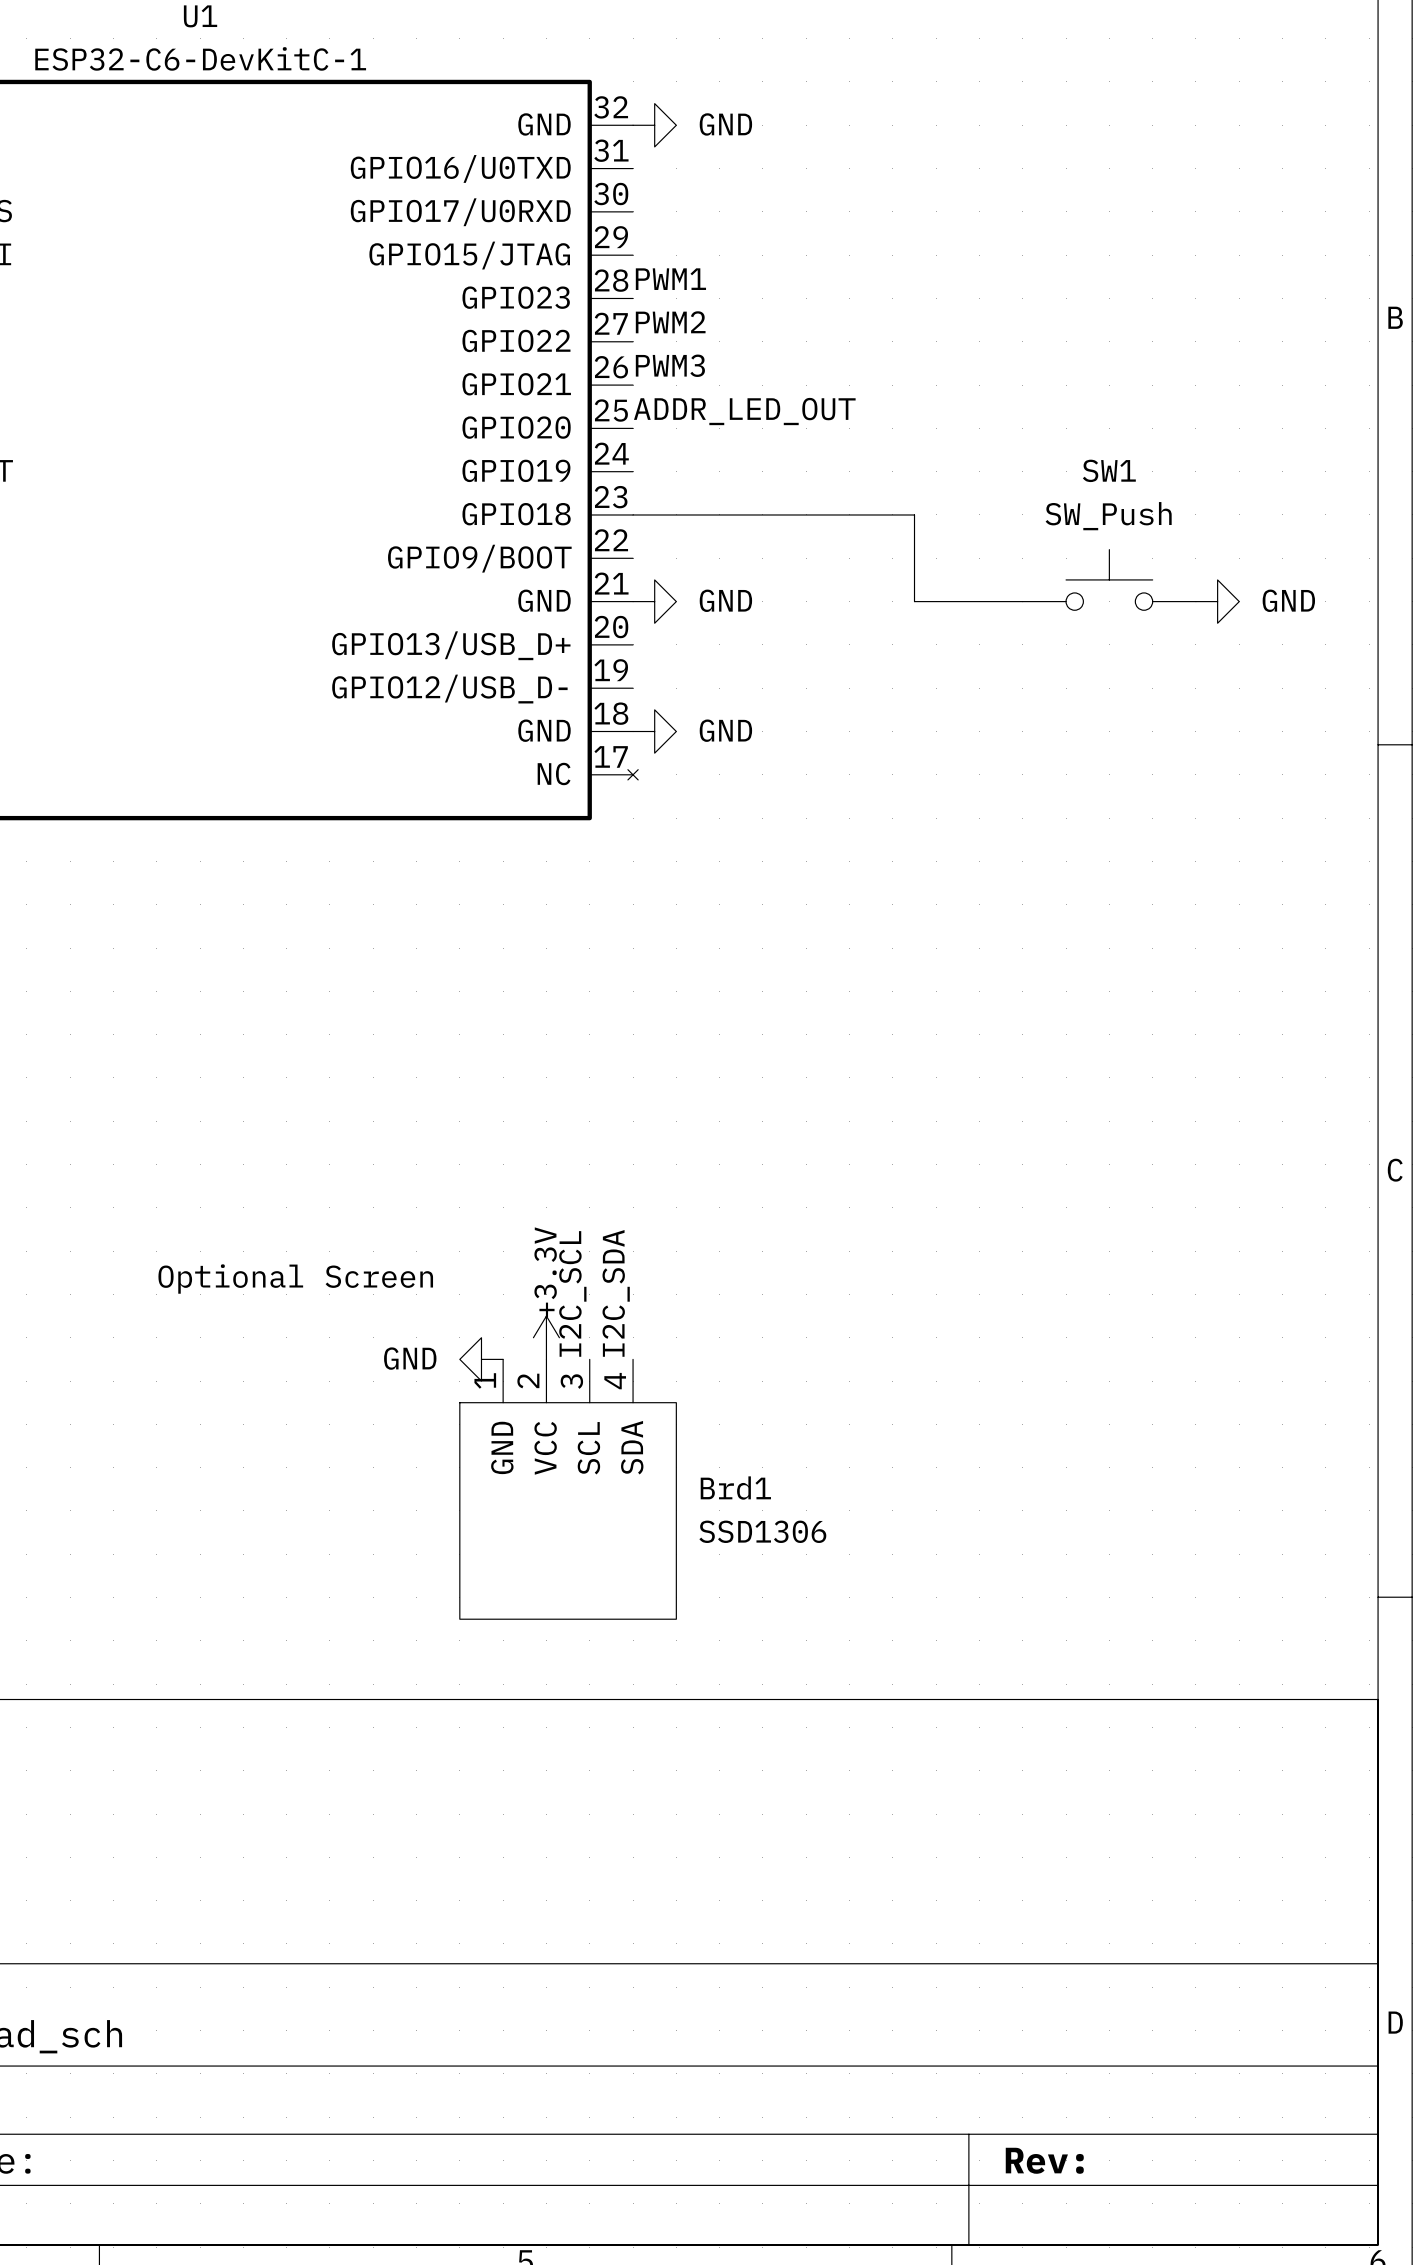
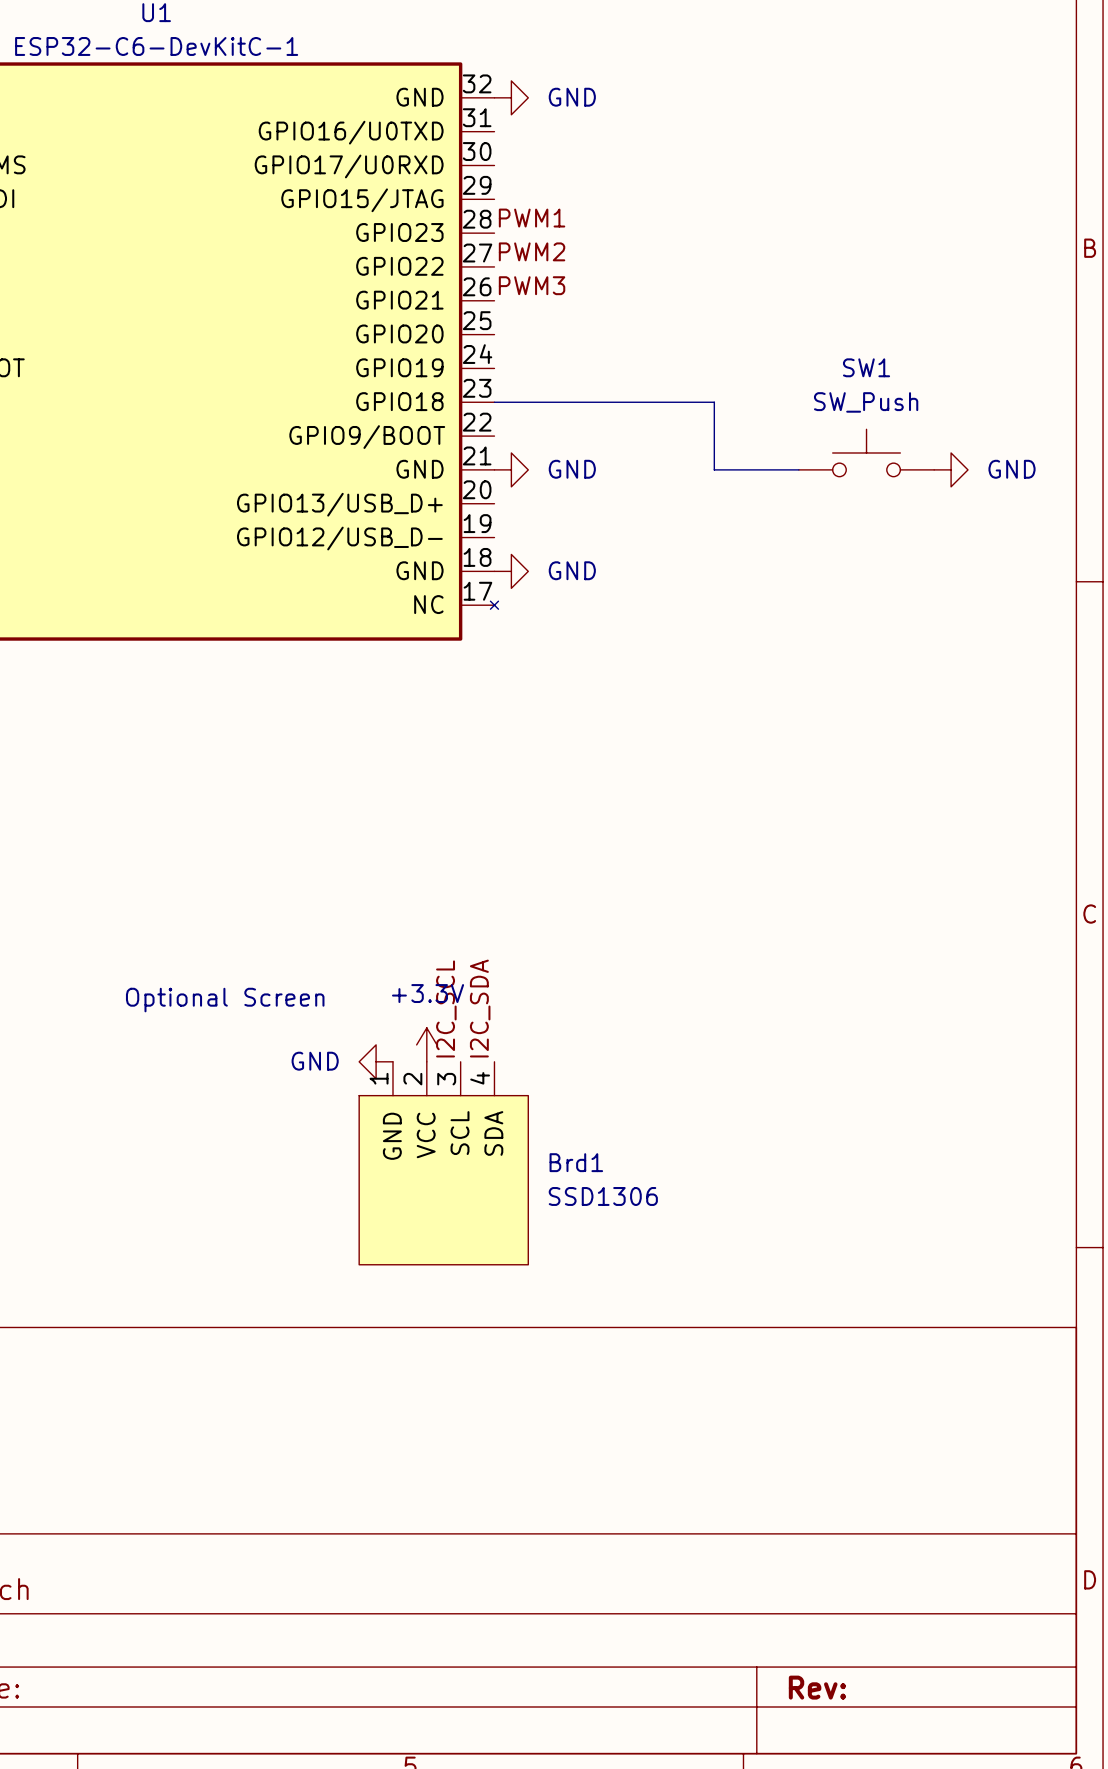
label: ADDR_LED_OUT (744, 411) -> none
power symbol text rotation: 0° (545, 1272) -> 90° clockwise (428, 993)

